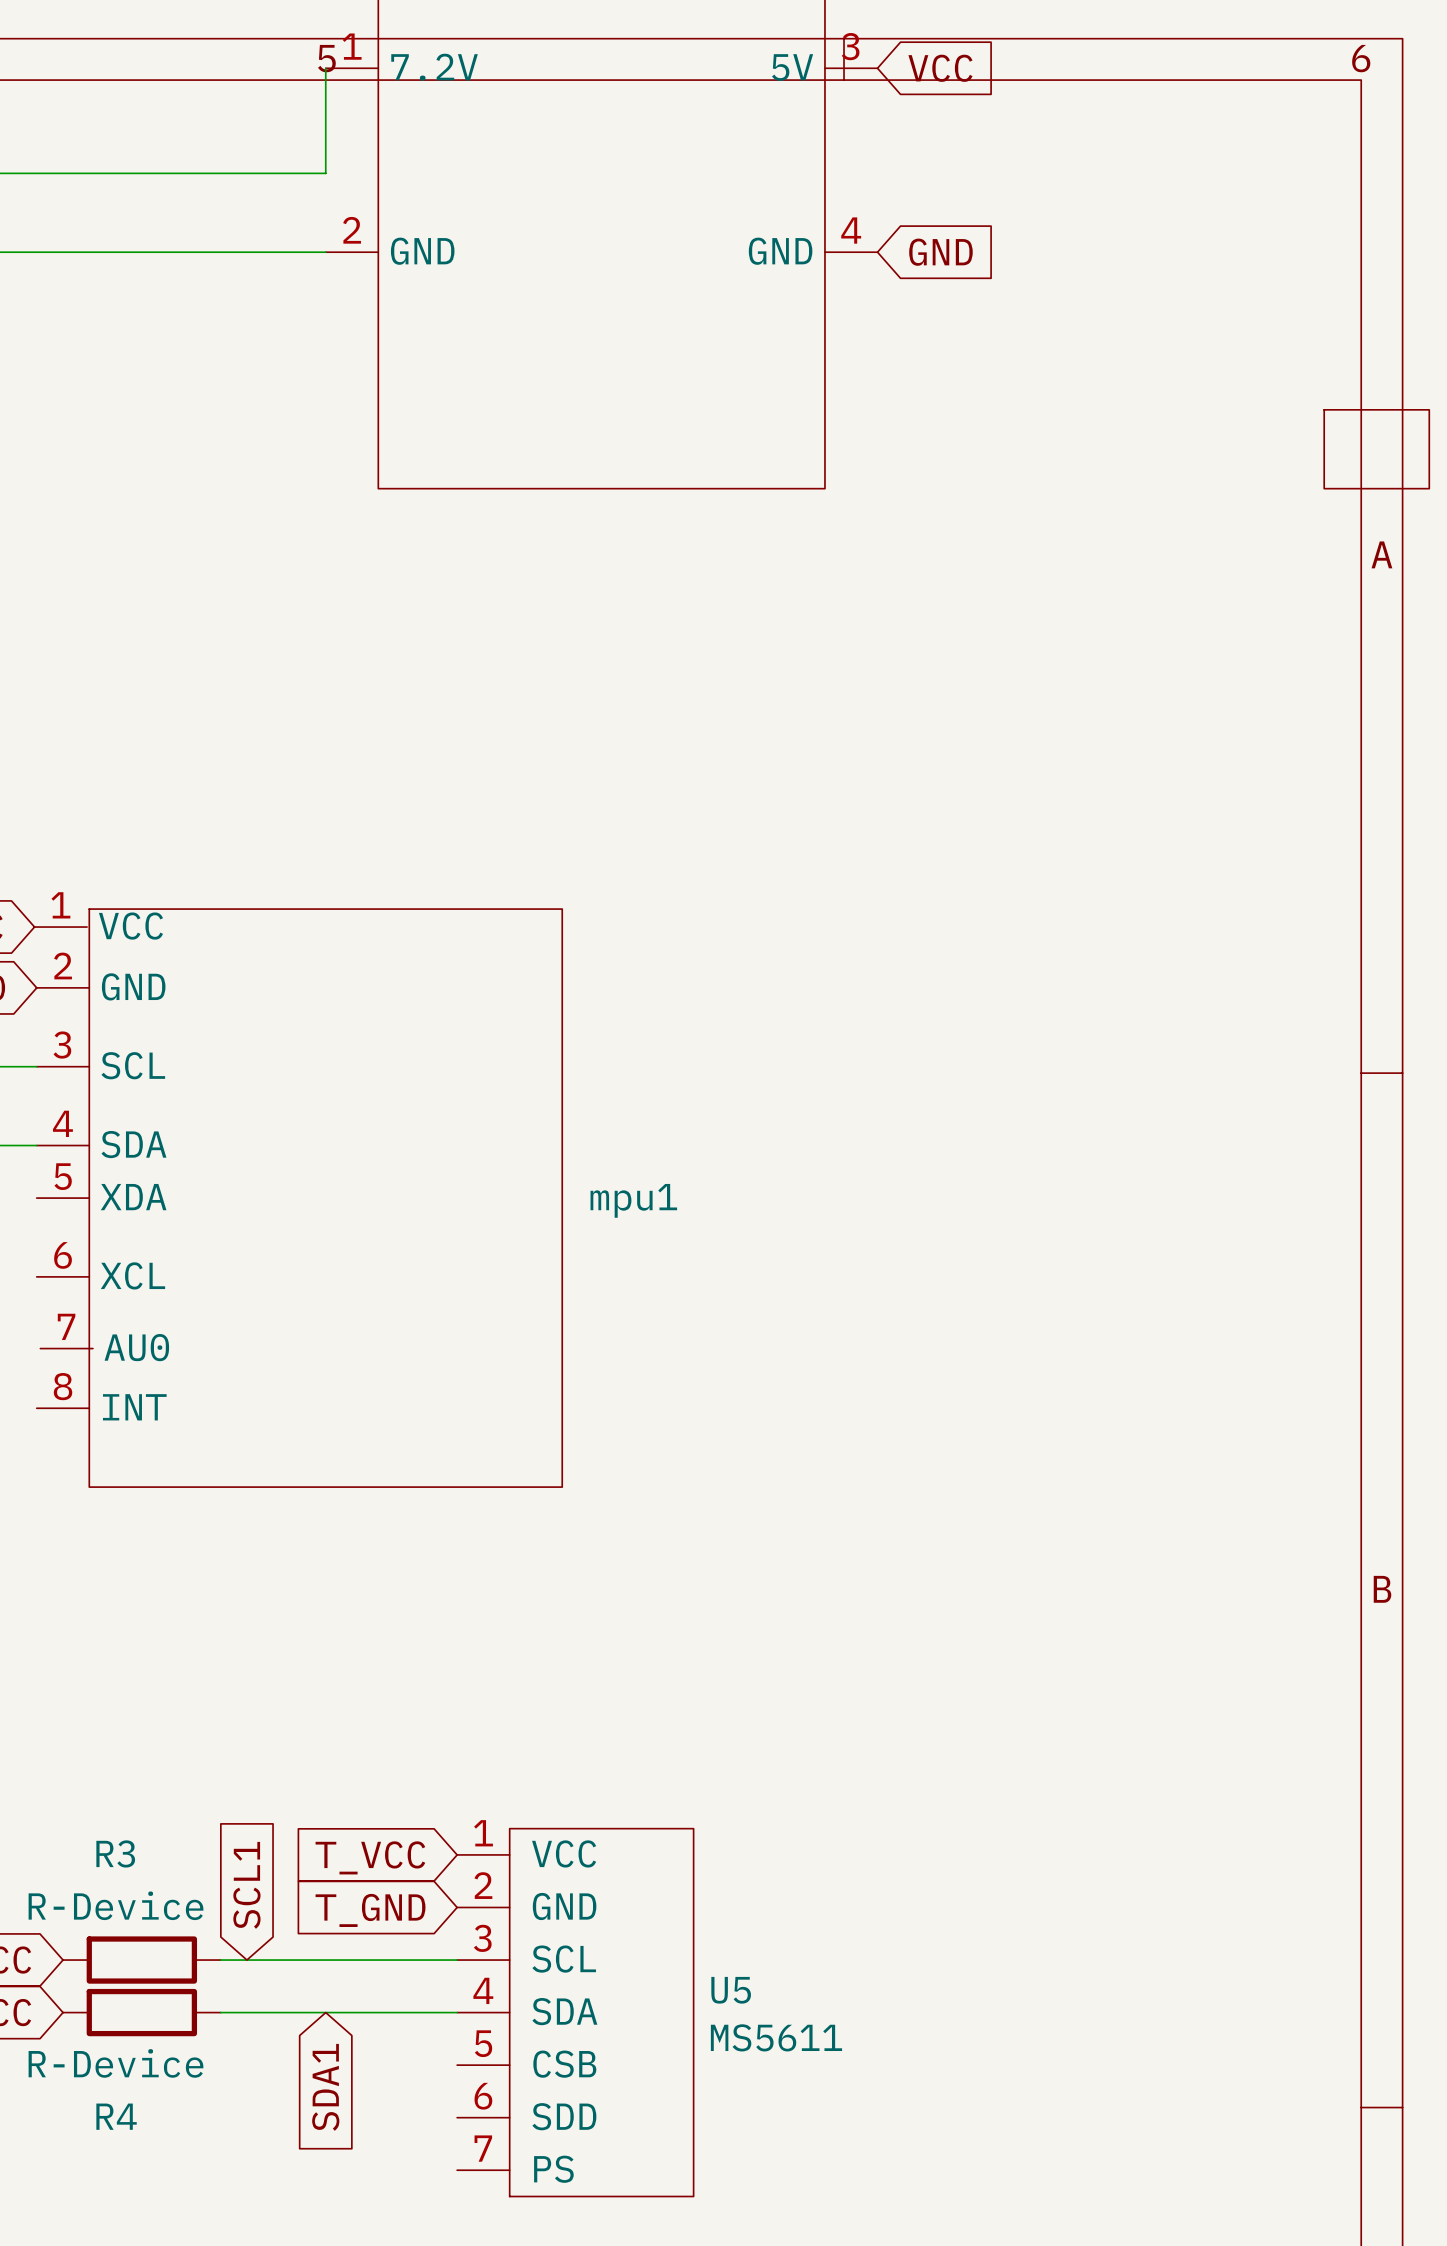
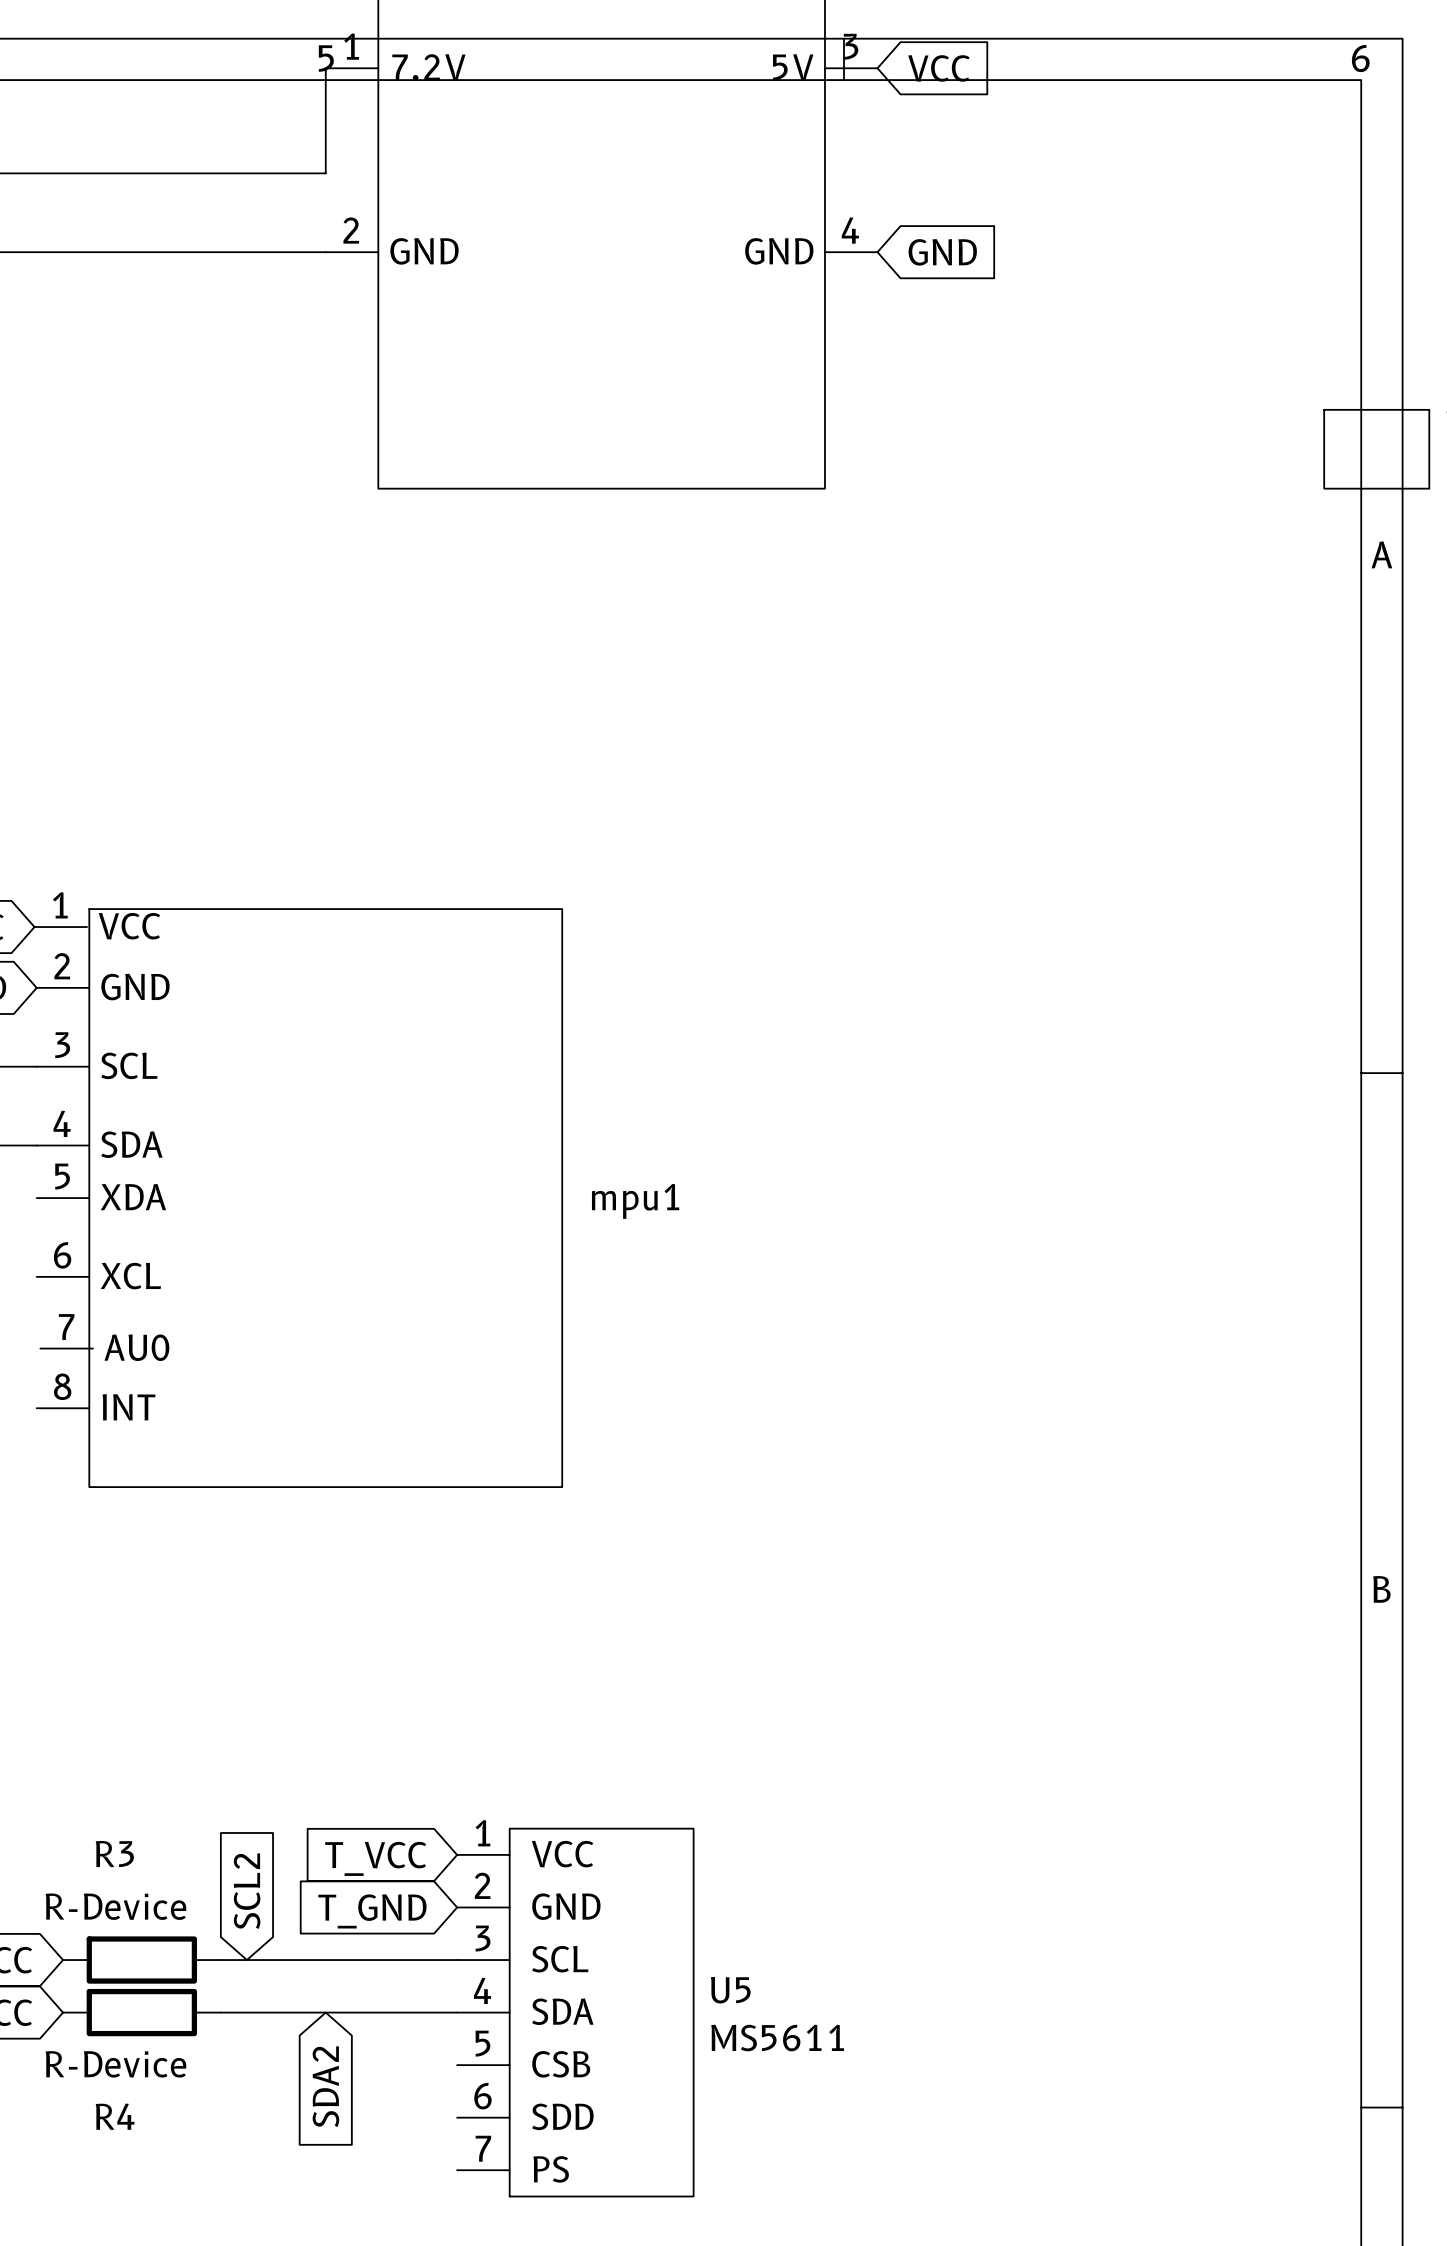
global label: SCL1 (246, 1885) -> SCL2 (247, 1891)
global label: SDA1 (325, 2087) -> SDA2 (325, 2086)

